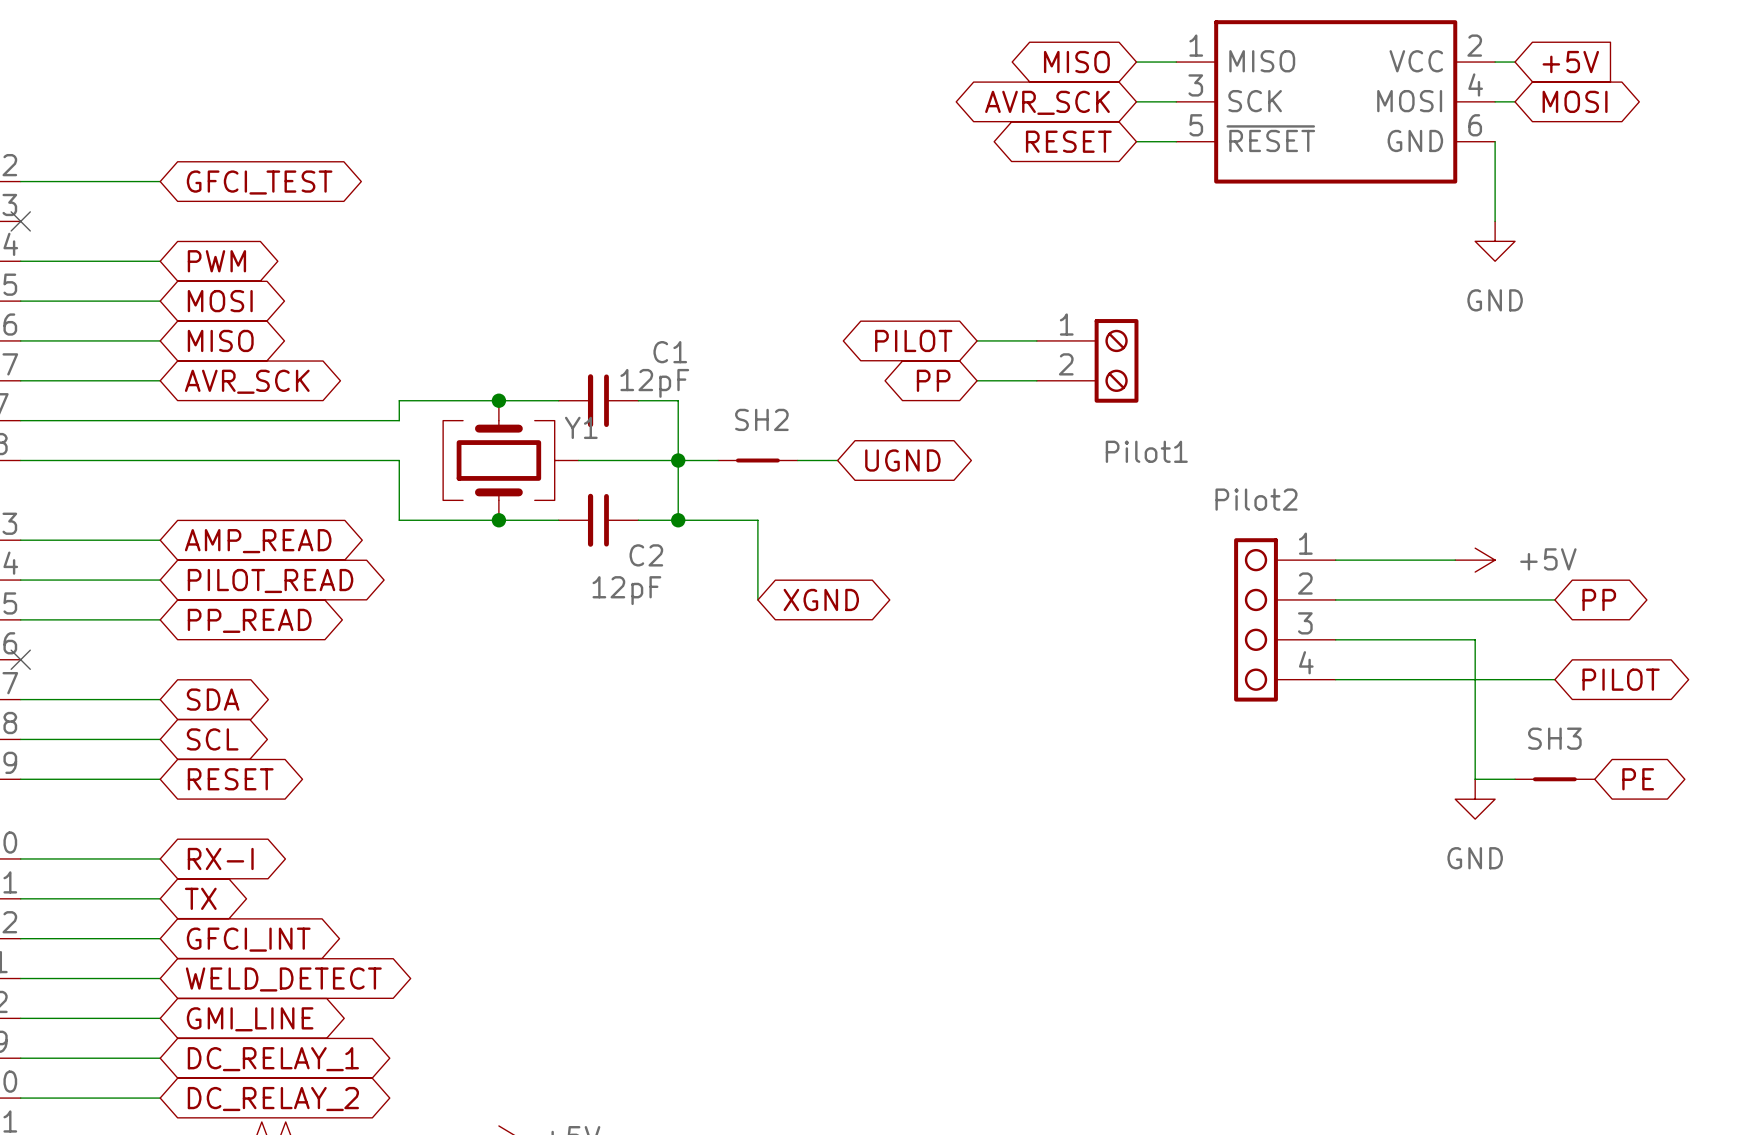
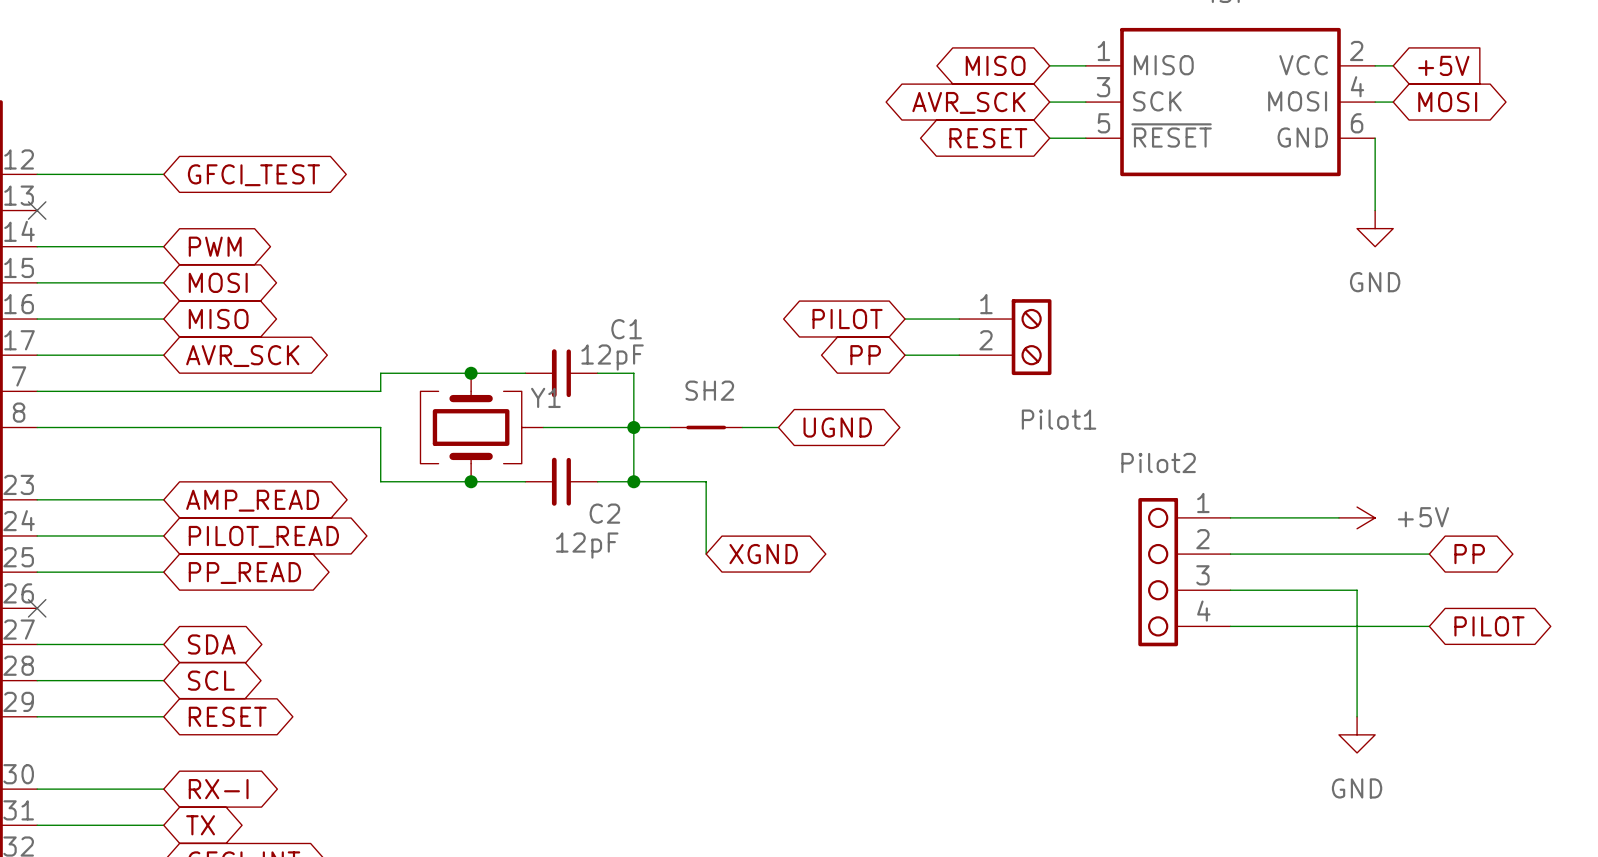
wire: (1475, 779) (1515, 779) -> none
SH3: (1554, 779) -> none
global label: PE (1638, 779) -> none

